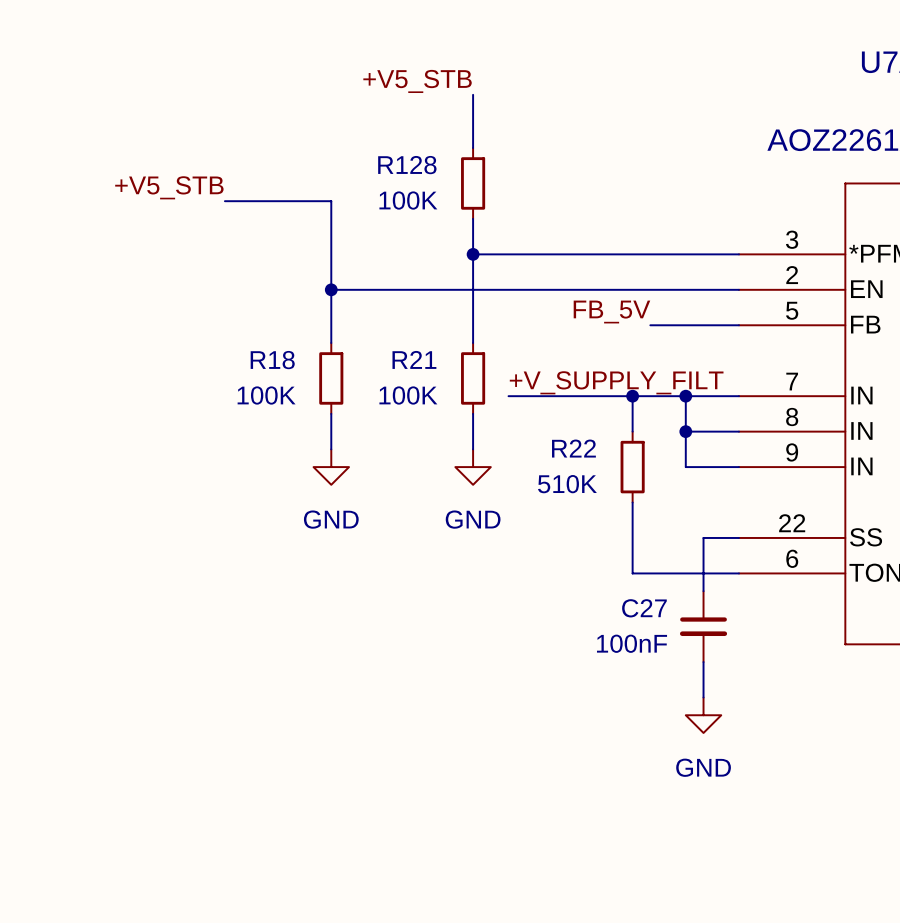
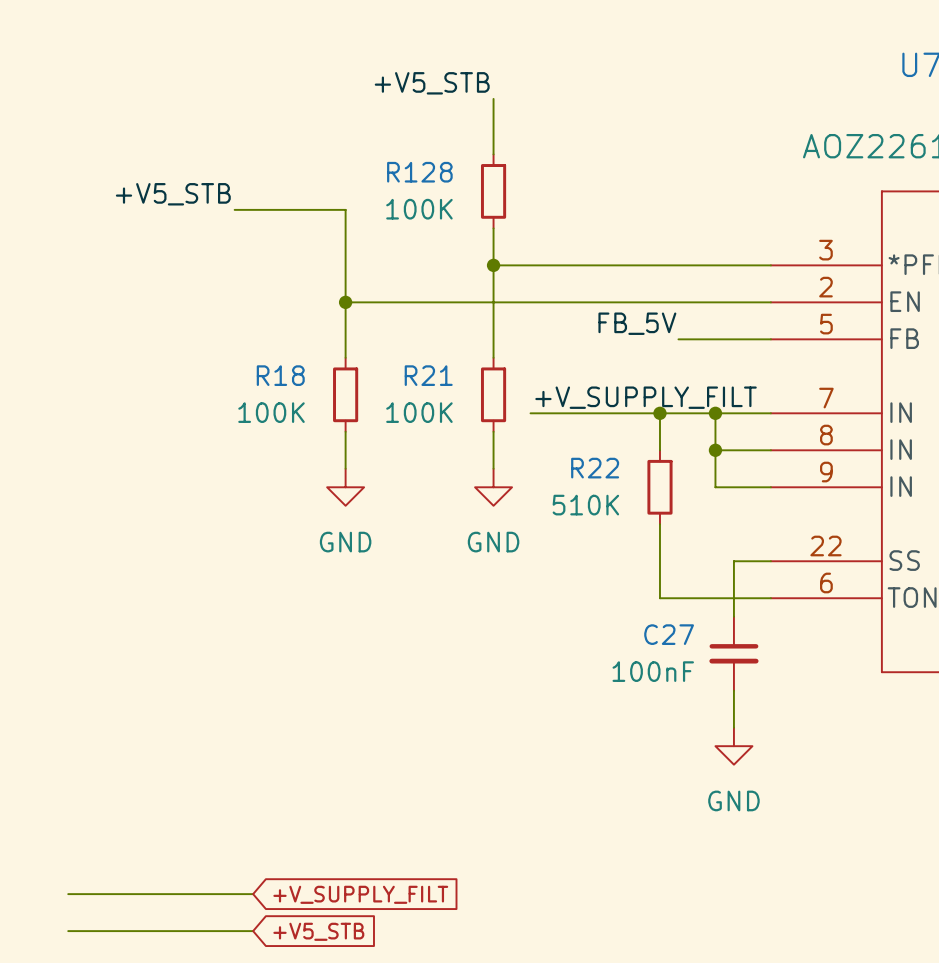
wire: none -> (68, 894) (253, 894)
global label: none -> +V_SUPPLY_FILT (360, 894)
wire: none -> (68, 931) (253, 931)
global label: none -> +V5_STB (318, 931)

